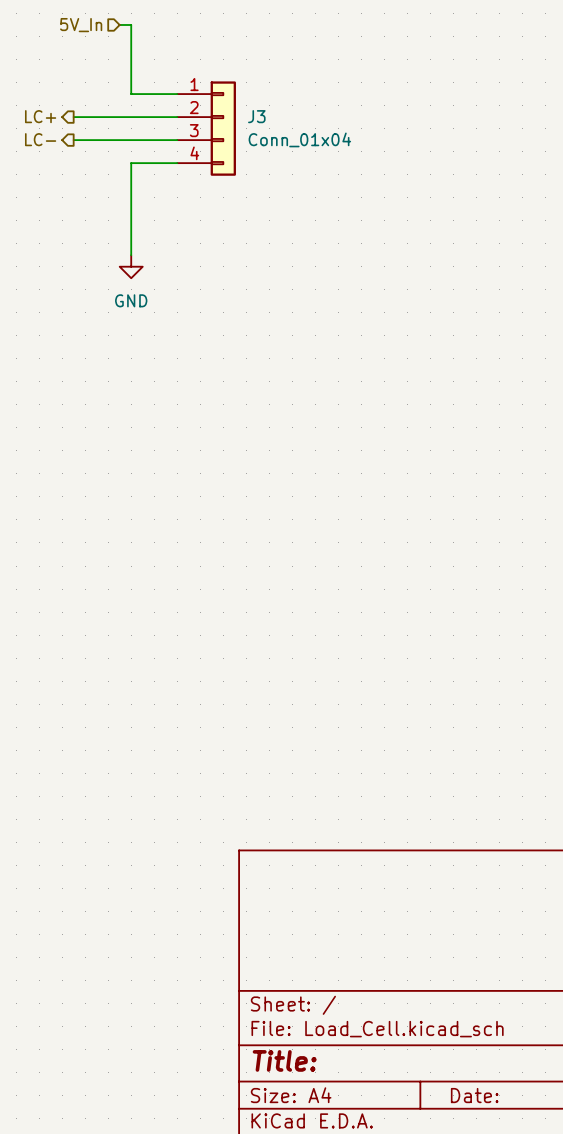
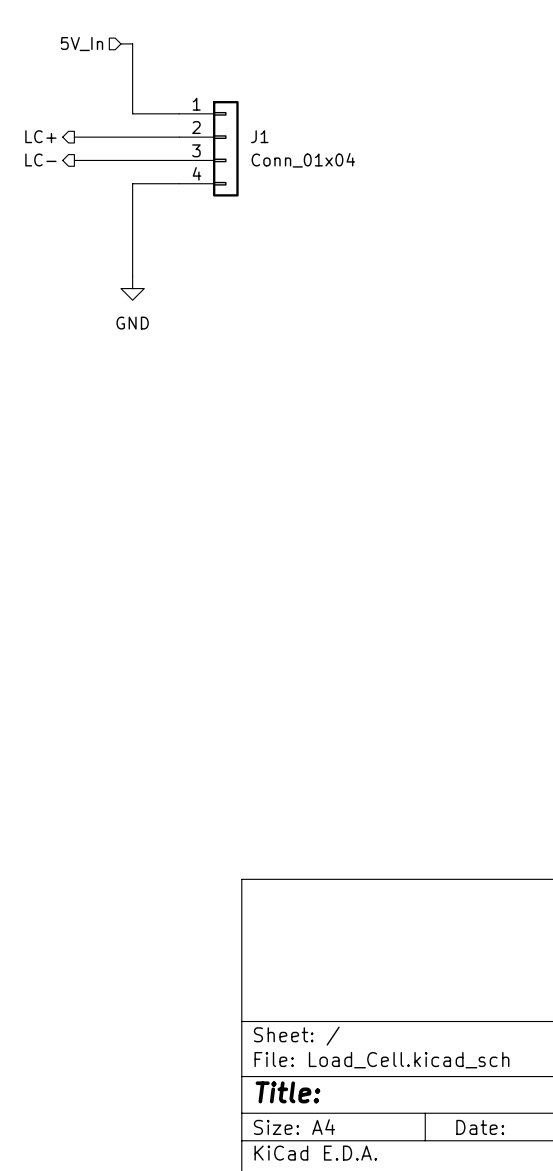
J3 name: J3 (256, 116) -> J1 (259, 136)

